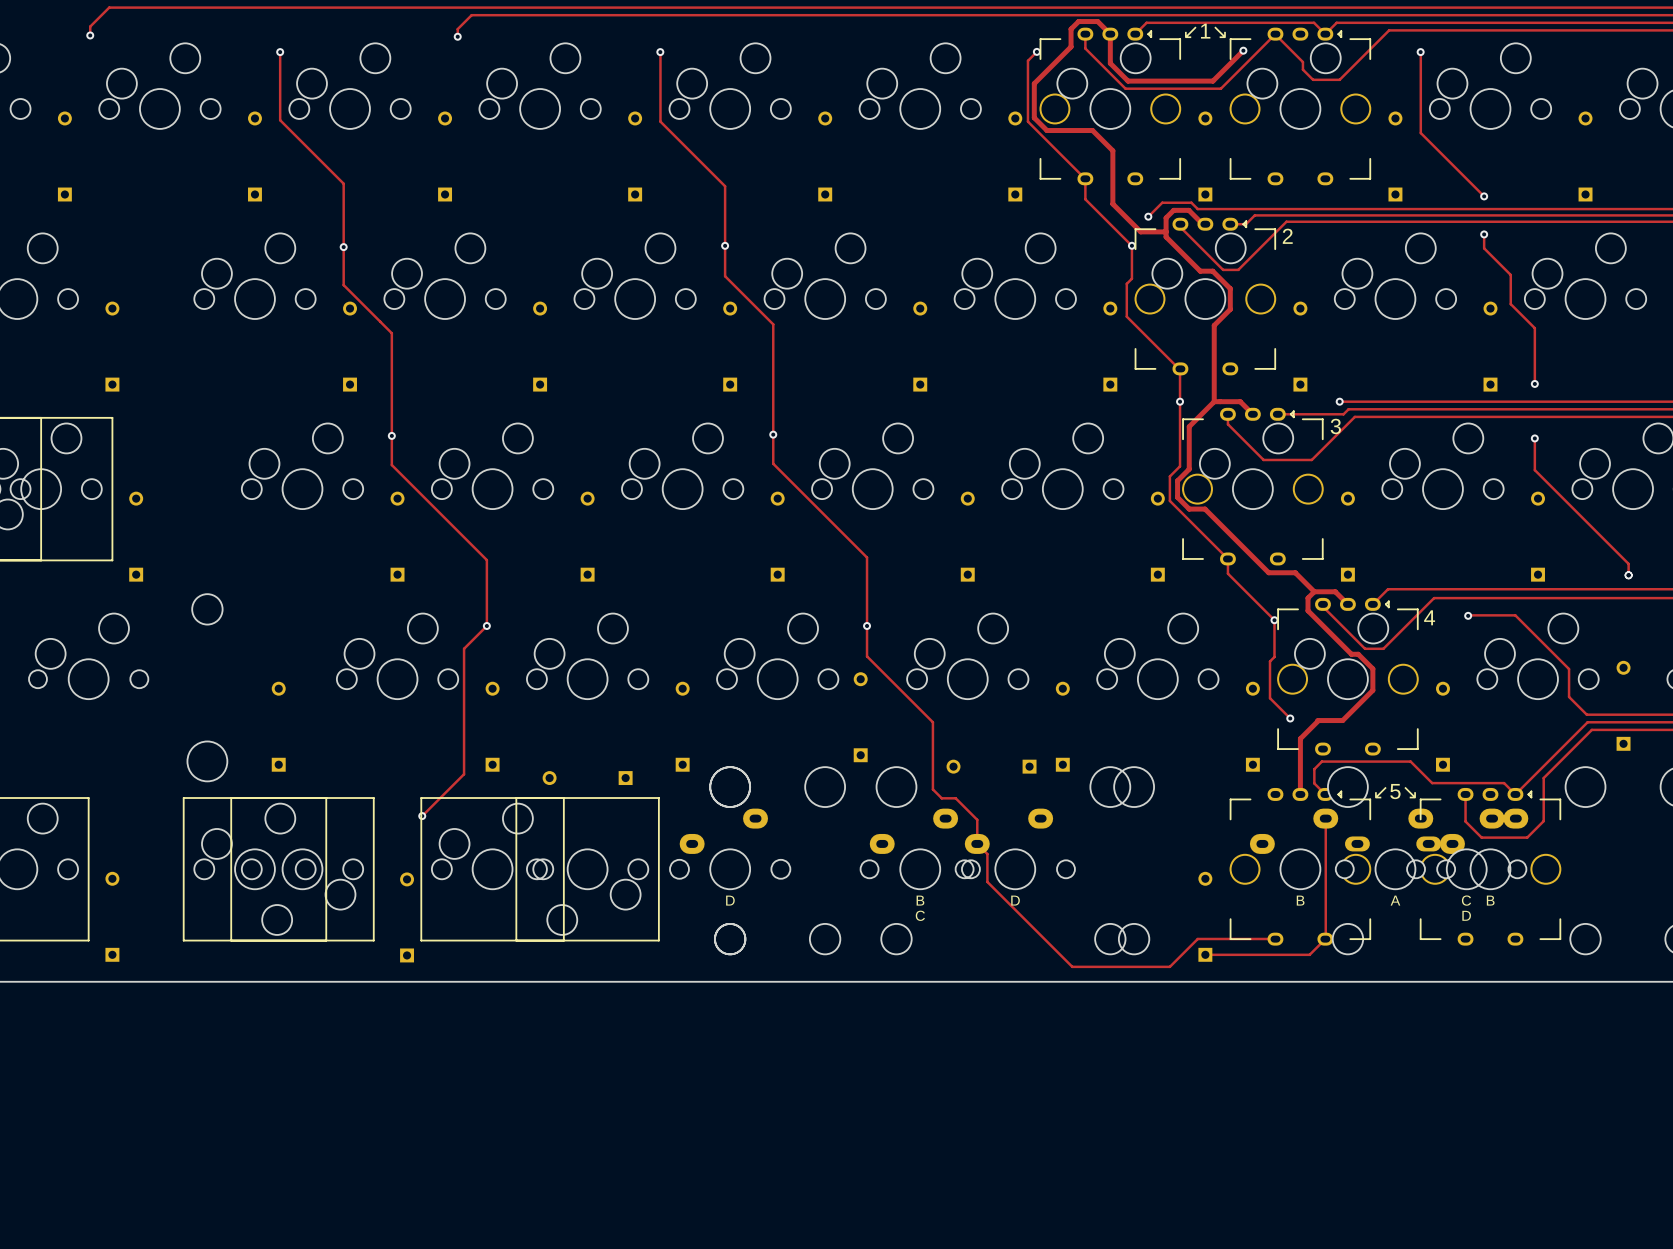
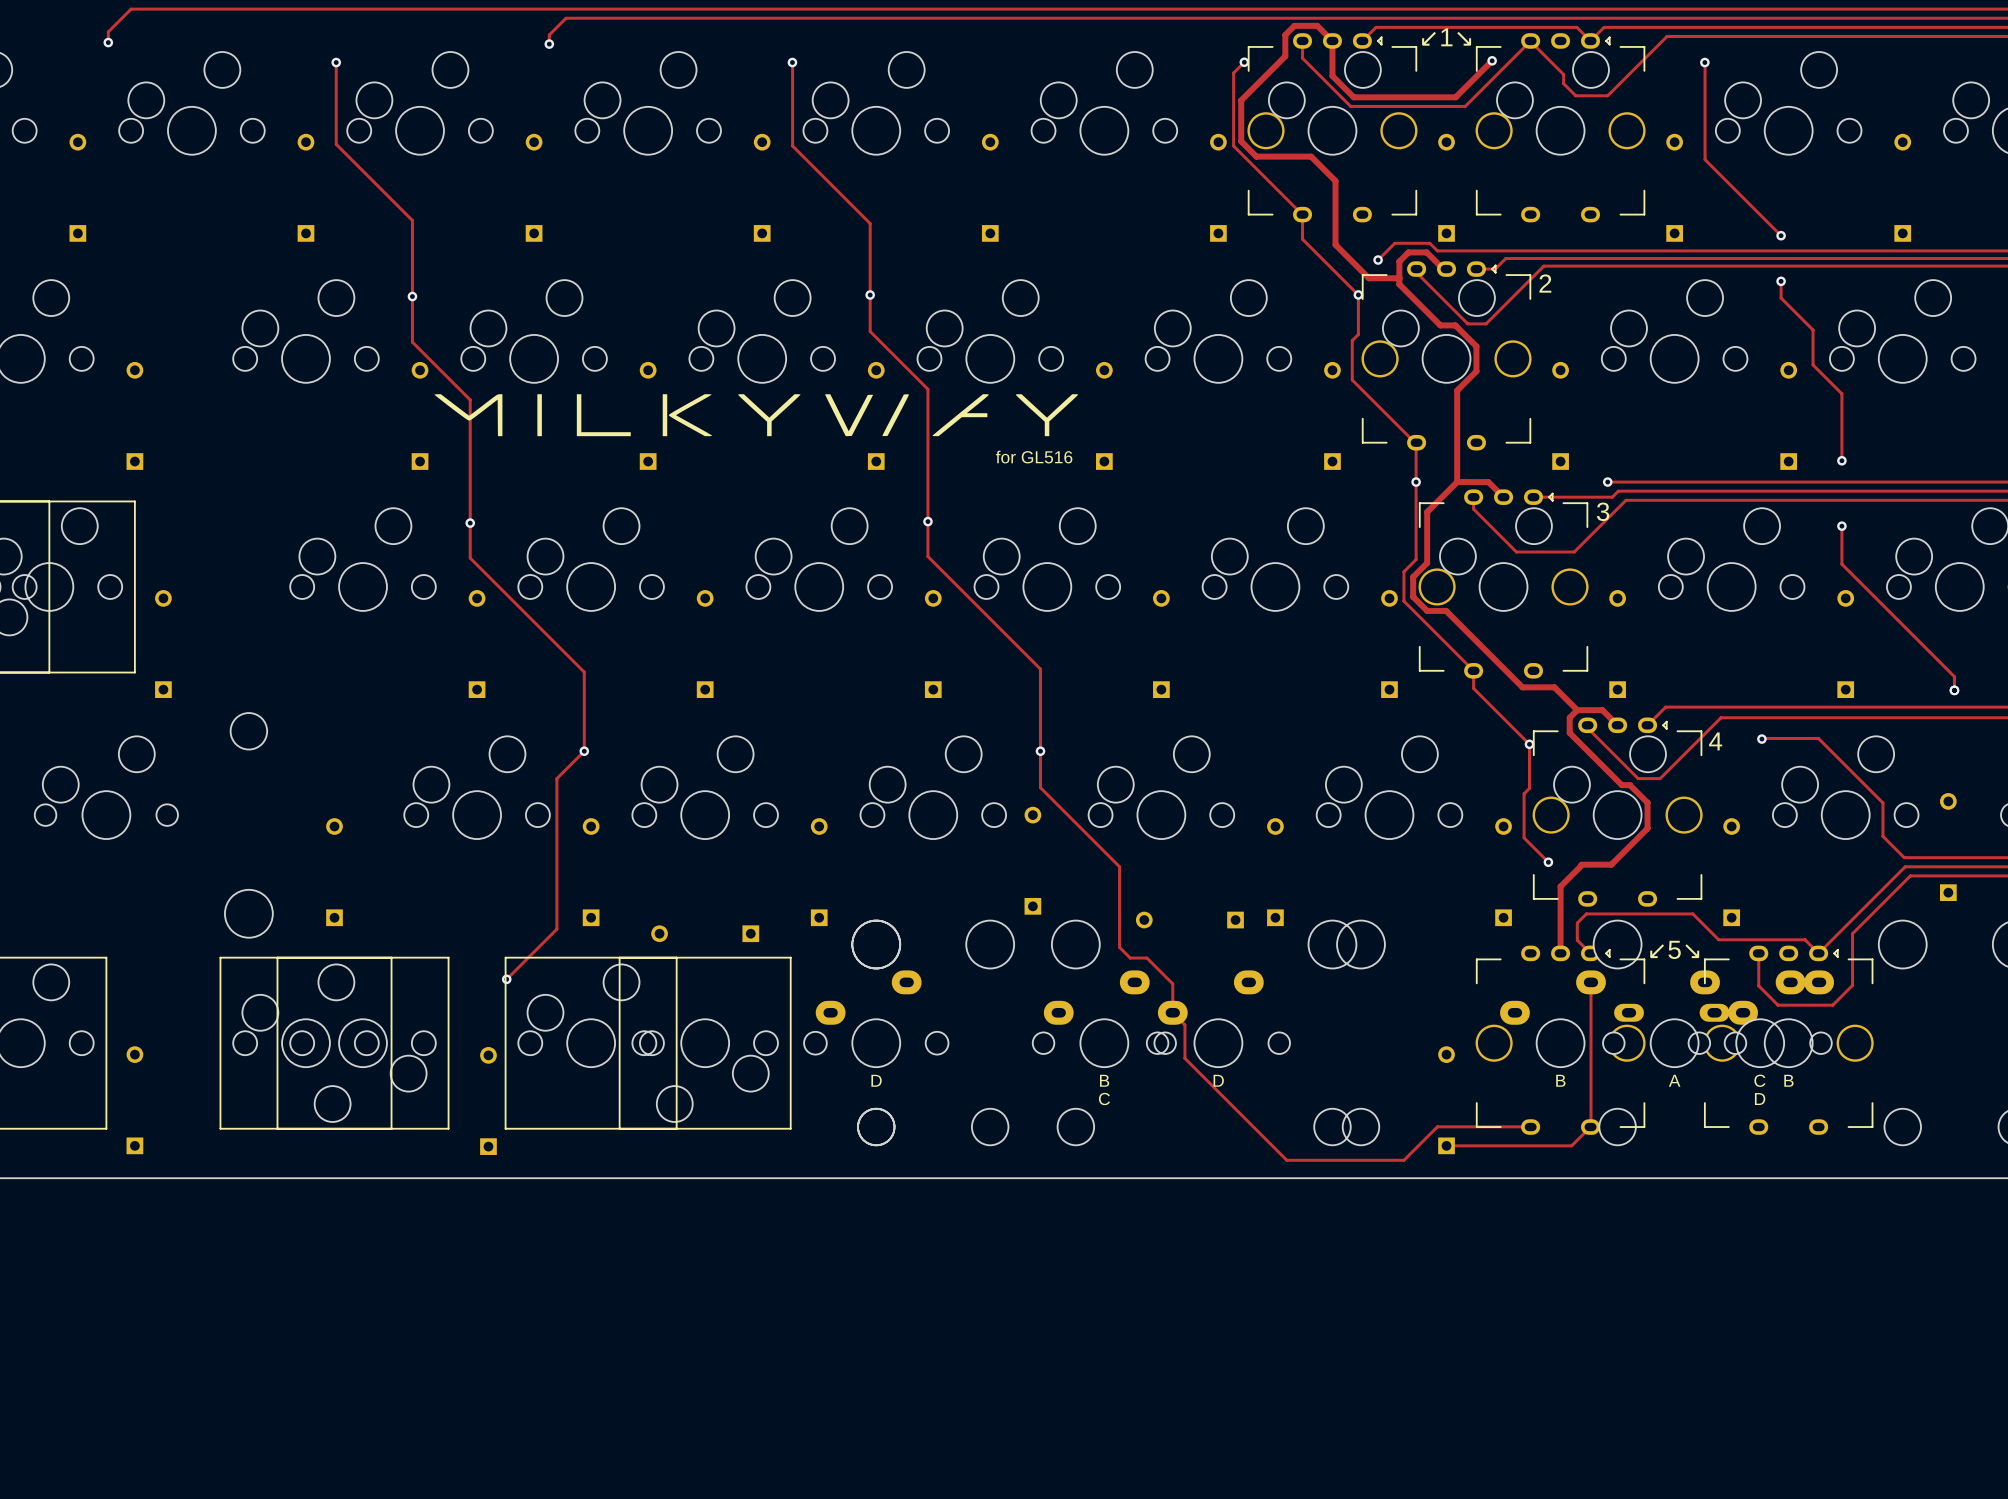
drawing: none -> [434, 394, 1079, 437]
text: none -> for GL516 (1034, 457)

